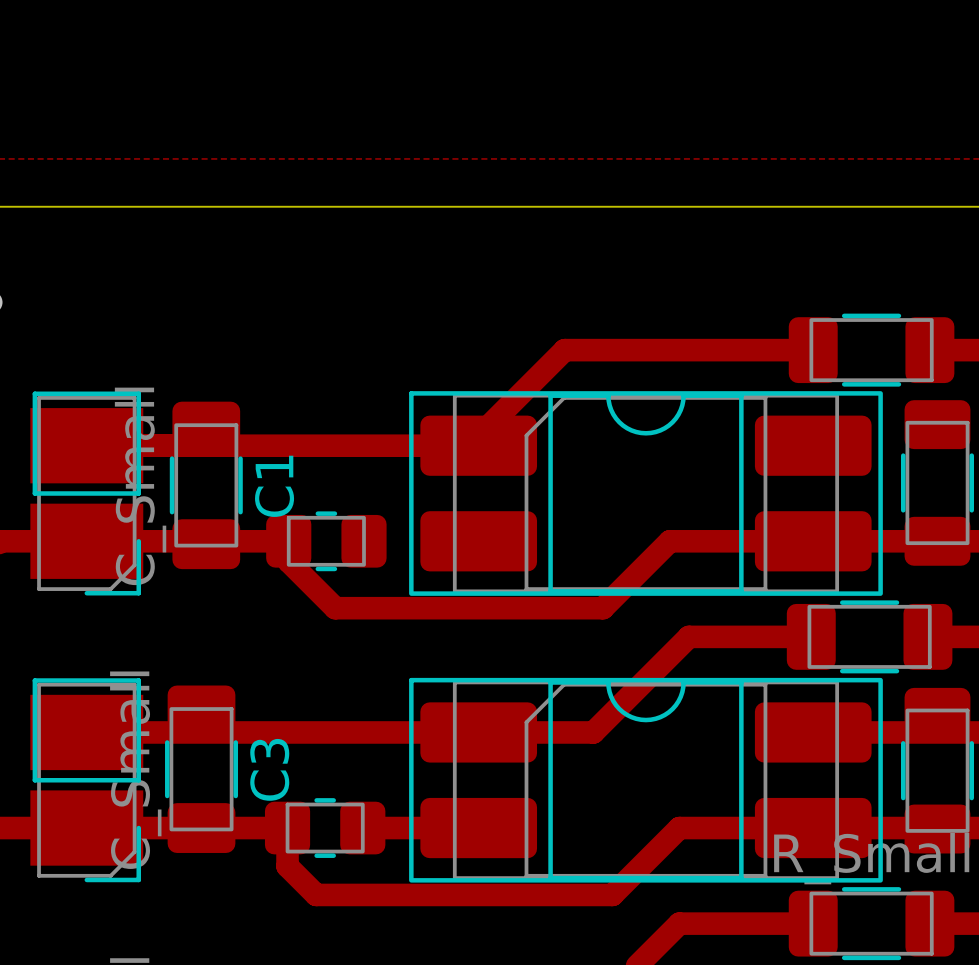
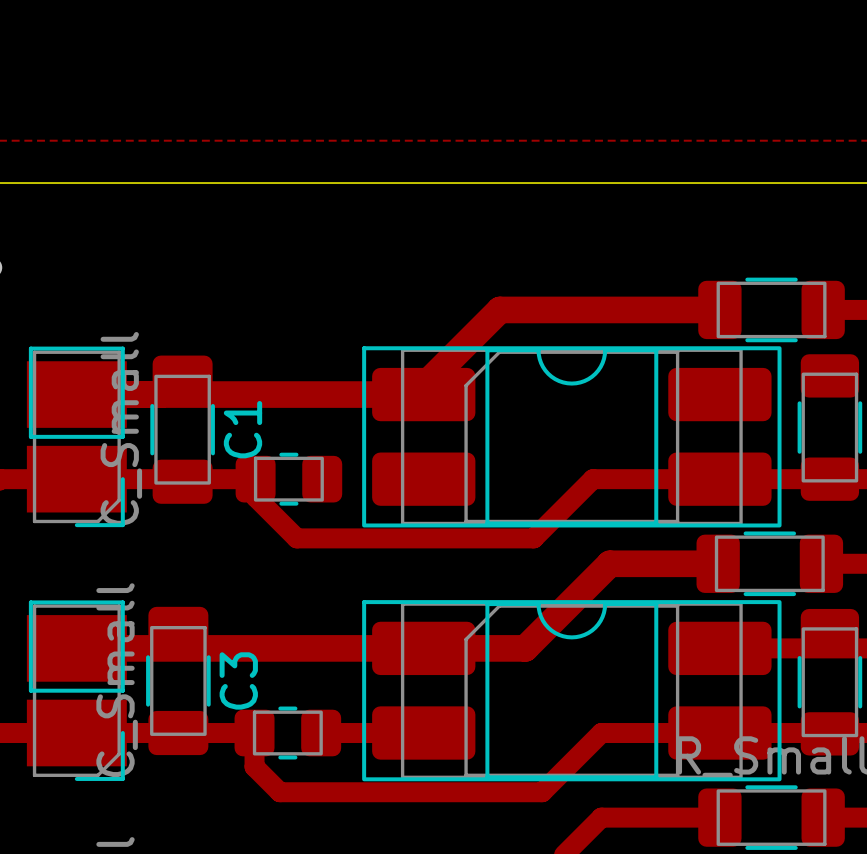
top track width: thin (813, 350) (564, 350) (469, 445) (86, 445) -> thick (719, 309) (499, 309) (415, 394) (76, 394)
top track width: thin (811, 636) (688, 636) (593, 732) (86, 732) -> thick (718, 563) (609, 563) (525, 648) (76, 648)

